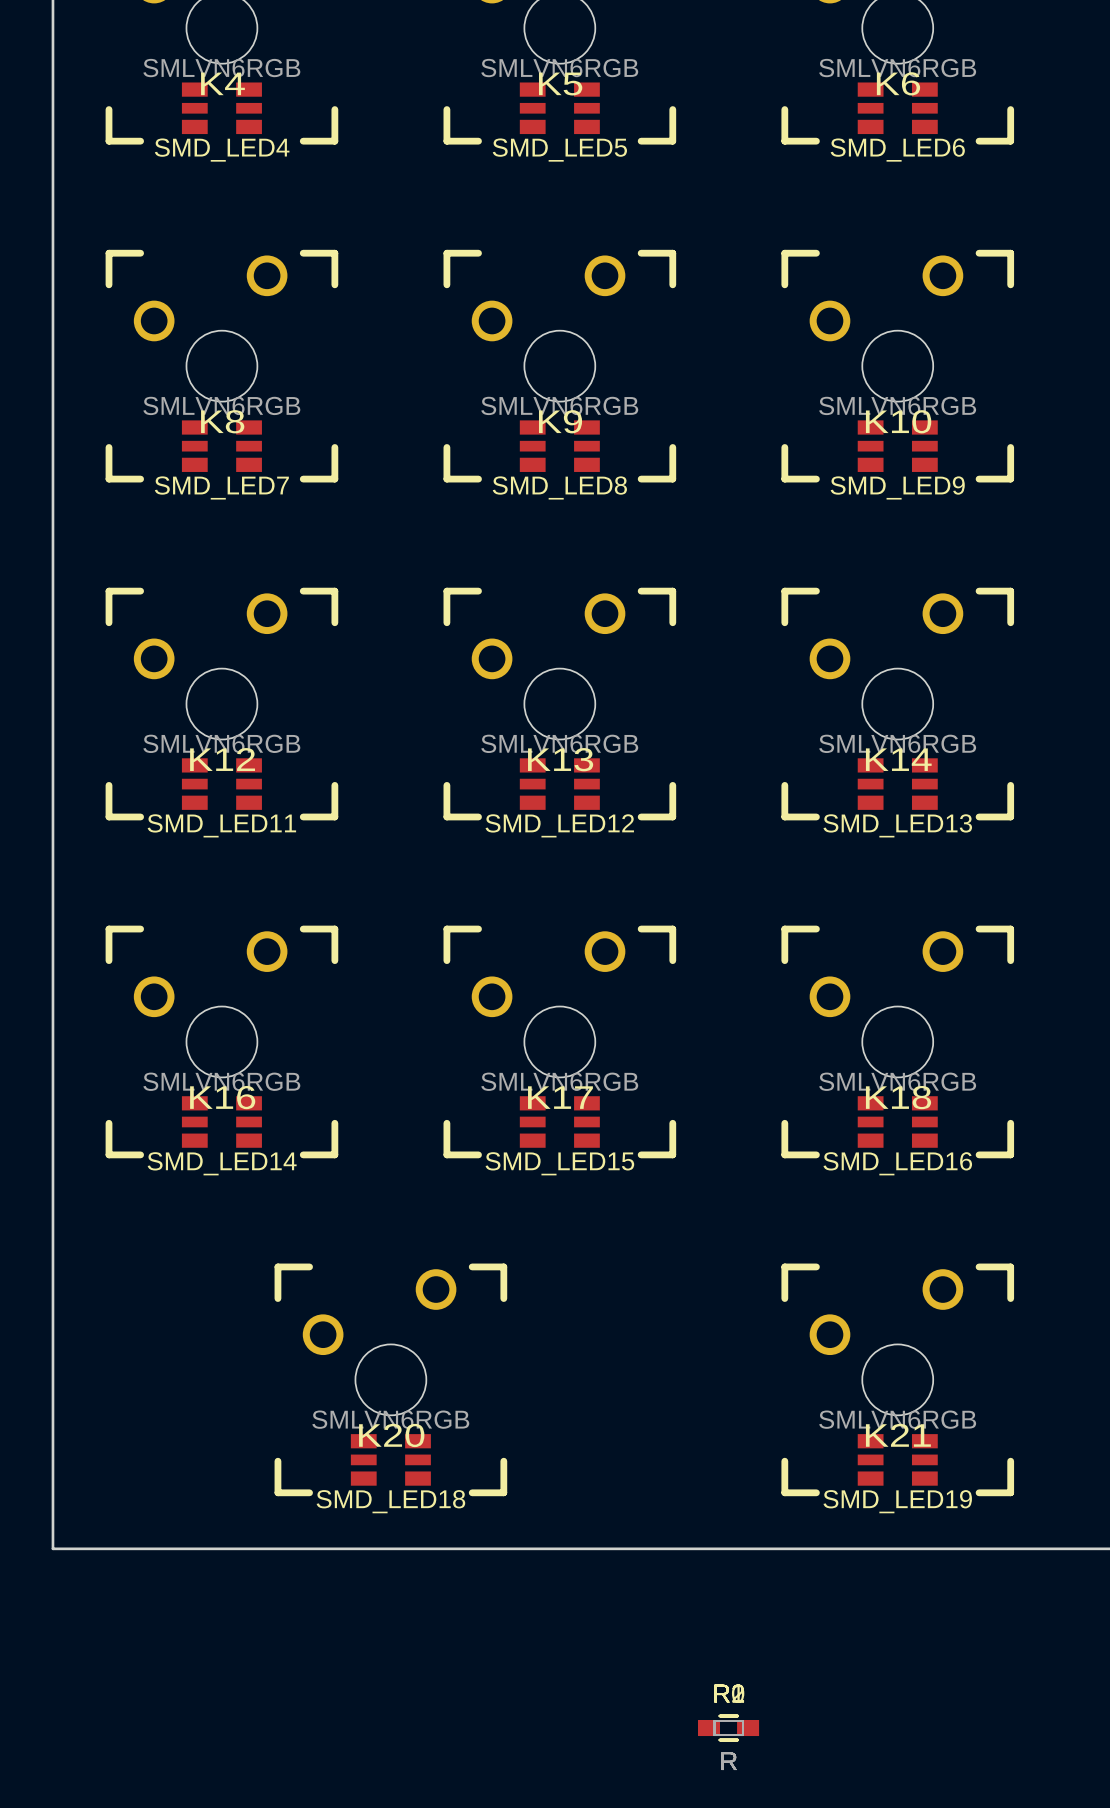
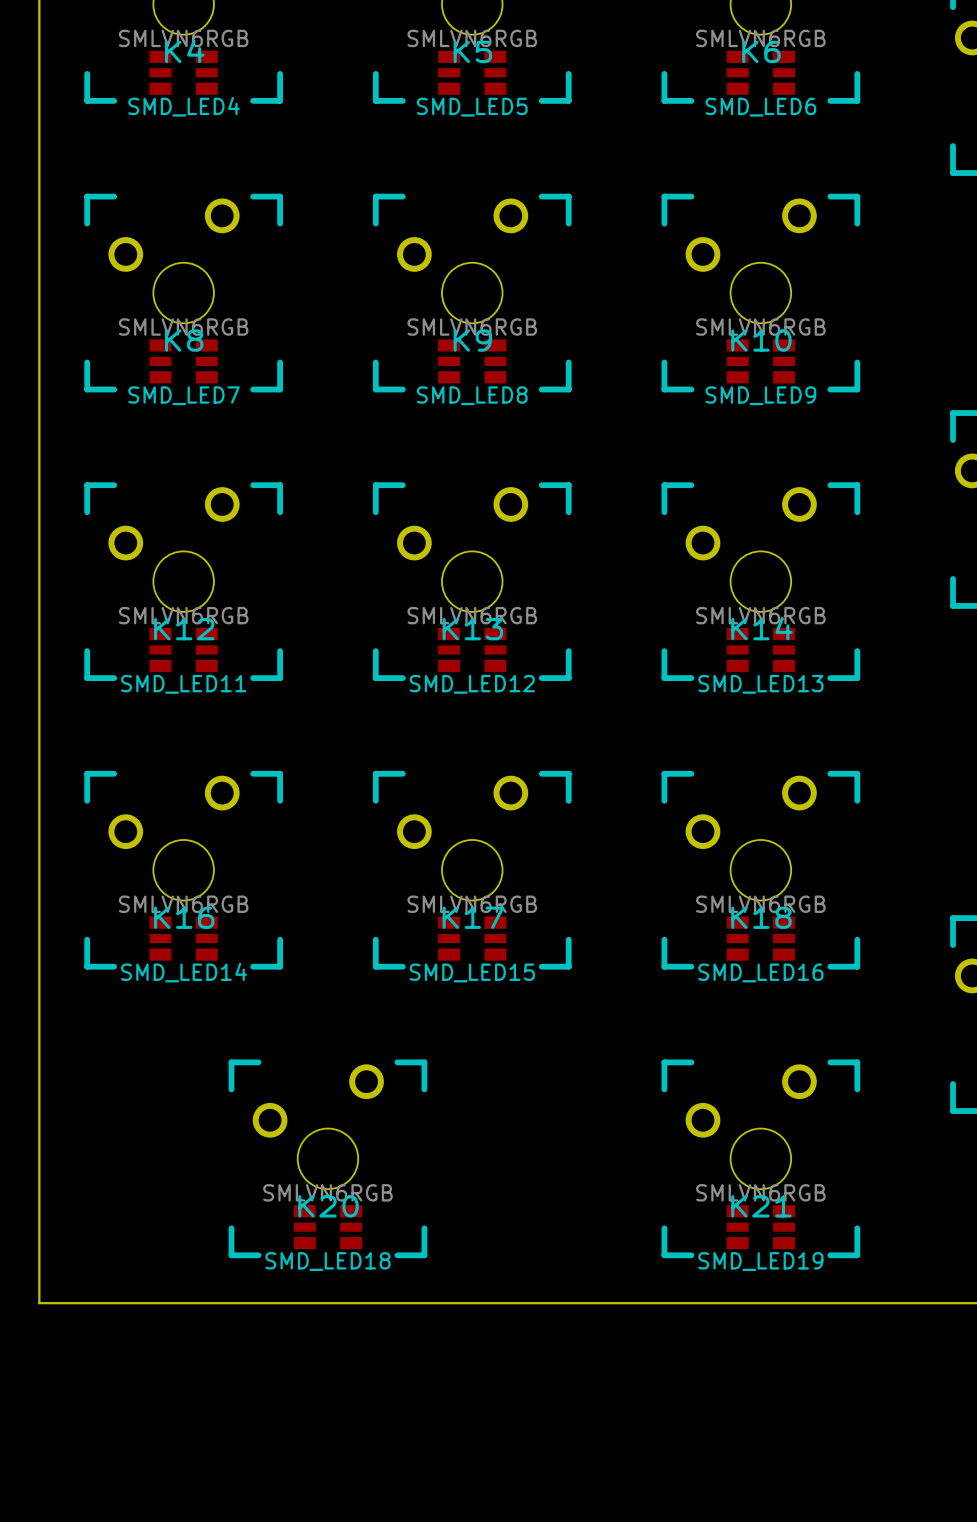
part: R (728, 1728) -> none
part: R (728, 1728) -> none
part: R (728, 1728) -> none

